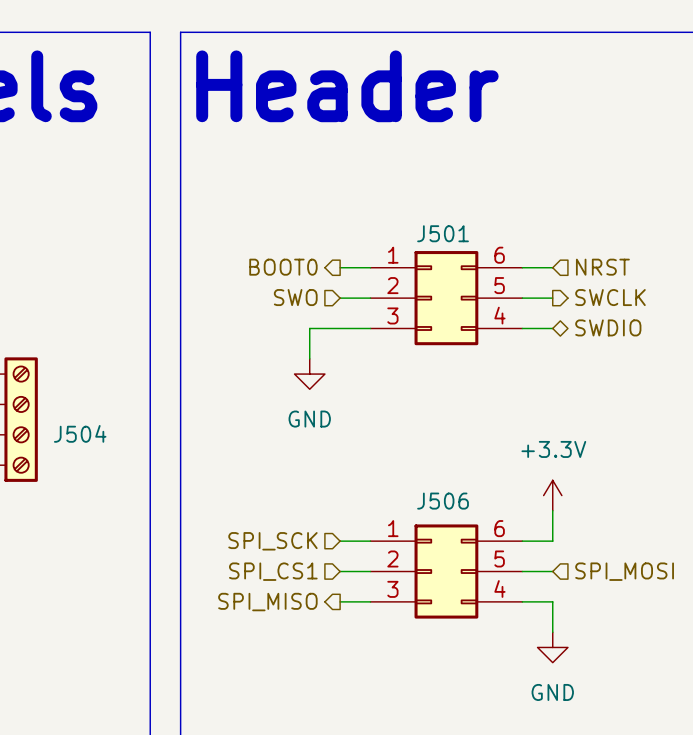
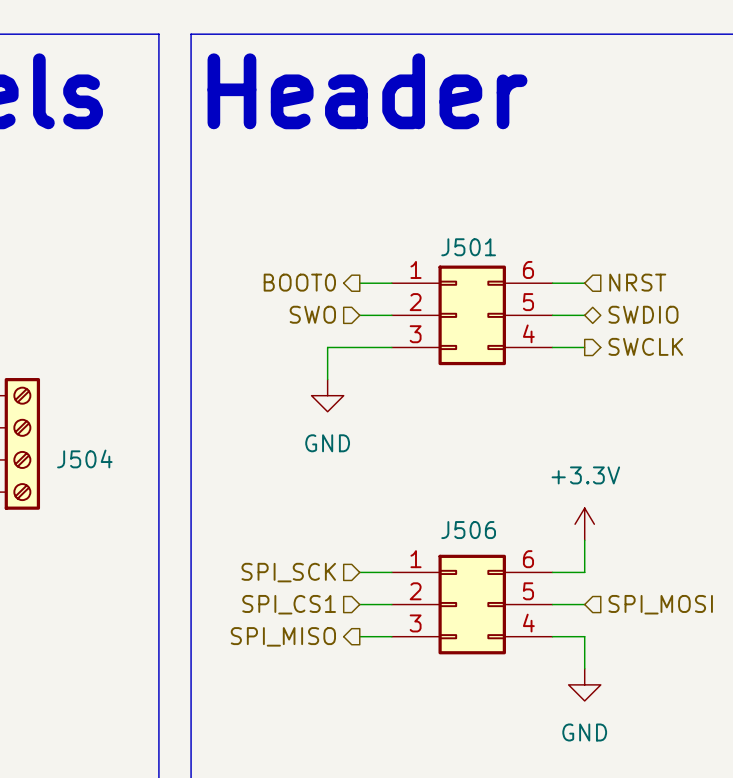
hierarchical label shape: output (610, 297) -> bidirectional (643, 314)
hierarchical label: SWCLK (610, 297) -> SWDIO (643, 314)
hierarchical label shape: bidirectional (608, 327) -> output (645, 346)
hierarchical label: SWDIO (608, 327) -> SWCLK (645, 346)

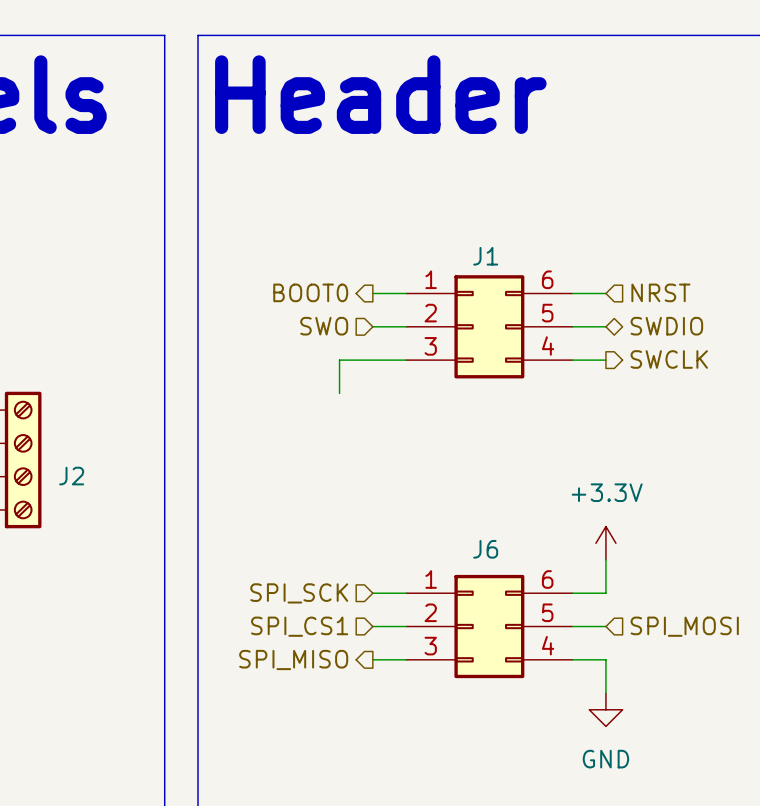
J501 name: J501 (468, 247) -> J1 (485, 256)
power symbol: GND (327, 395) -> none
J504 name: J504 (84, 458) -> J2 (71, 476)
J506 name: J506 (468, 530) -> J6 (485, 549)

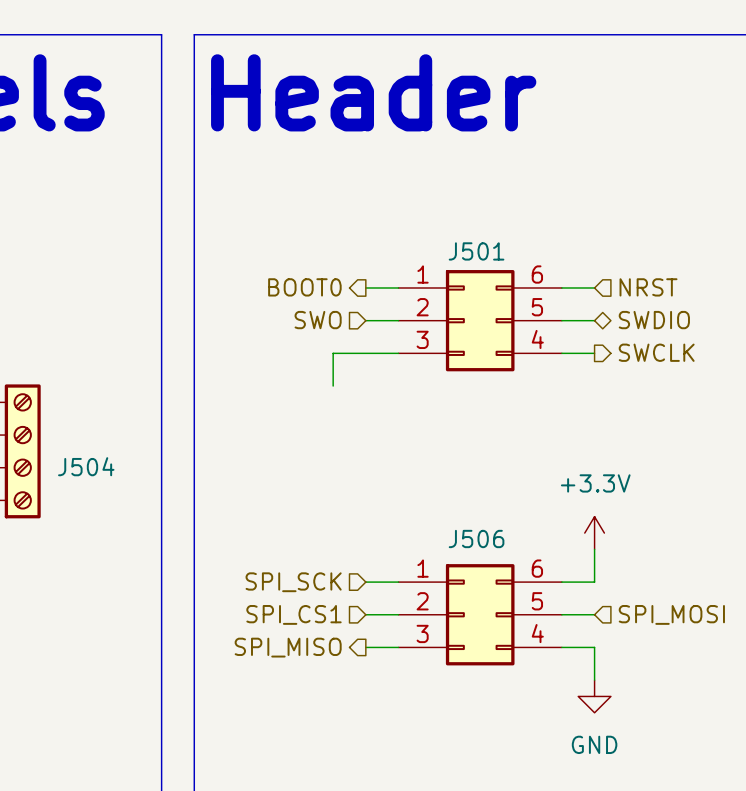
J1 name: J1 (485, 256) -> J501 (476, 251)
J2 name: J2 (71, 476) -> J504 (86, 466)
J6 name: J6 (485, 549) -> J506 (476, 538)

